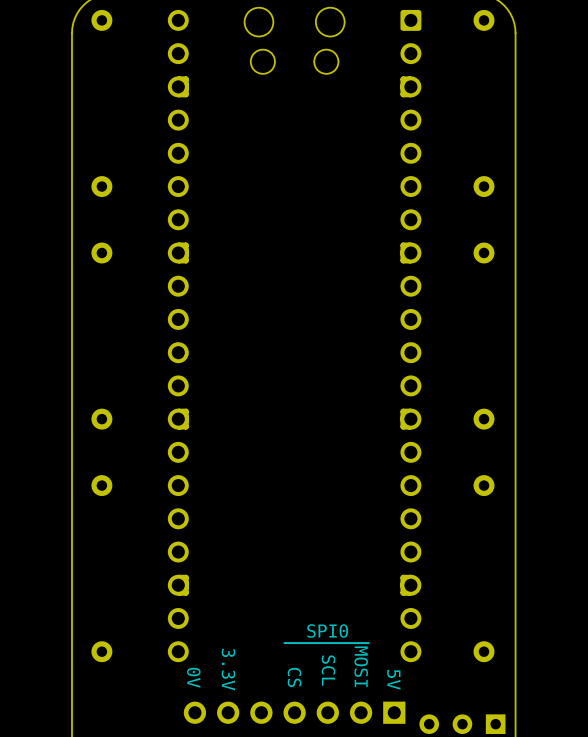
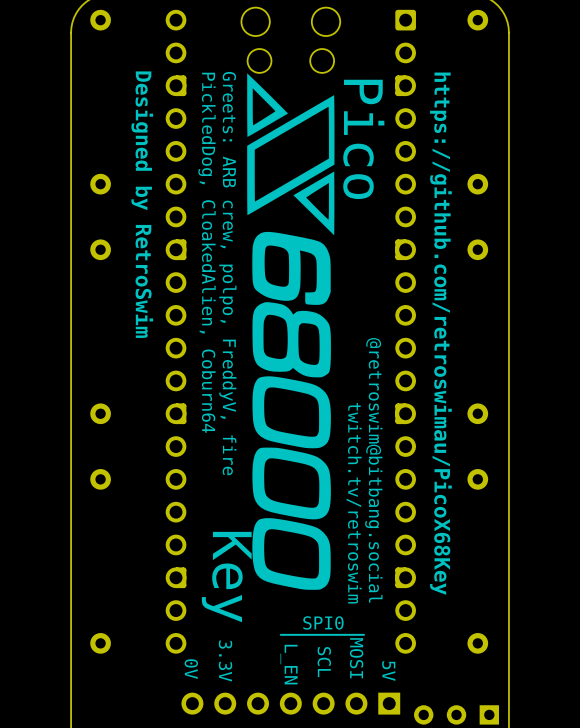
drawing: none -> [247, 73, 335, 590]
text: none -> Pico (363, 139)
text: none -> Designed by RetroSwim (142, 204)
text: none -> PickledDog, CloakedAlien, Coburn64 (207, 252)
text: none -> Greets: ARB crew, polpo, FreddyV, fire (227, 273)
text: none -> https://github.com/retroswimau/PicoX68Key (440, 333)
text: none -> @retroswim@bitbang.social (373, 470)
text: none -> twitch.tv/retroswim (354, 503)
text: none -> Key (226, 577)
text: none -> L_EN (289, 664)
text: CS (294, 677) -> none

